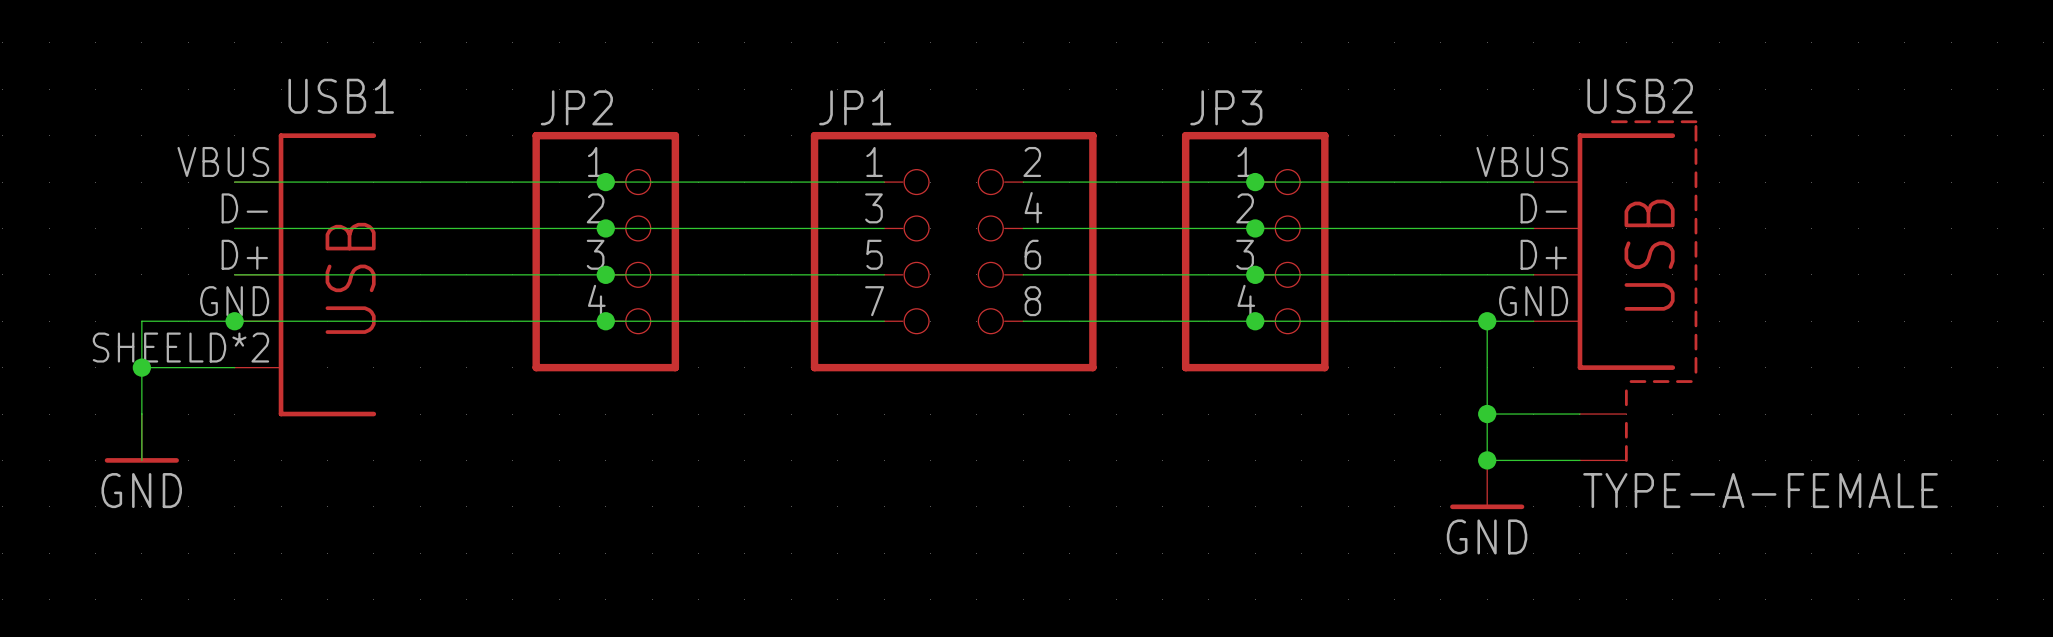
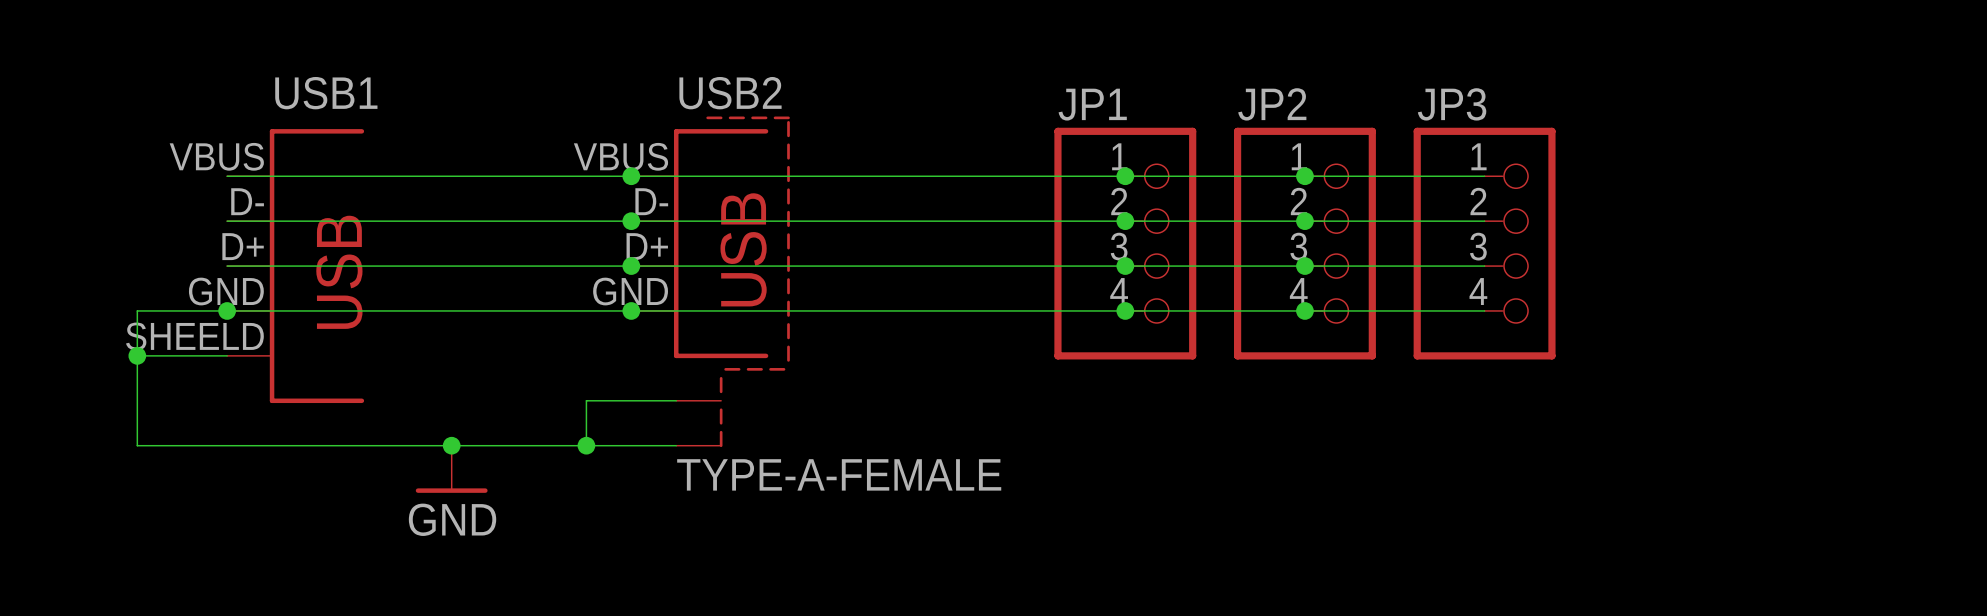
JP1 name position: JP1 (855, 107) -> JP1 (1092, 104)
JP1 symbol: [810, 131, 1097, 372] -> [1054, 127, 1197, 360]
junction: (605, 182) -> none
junction: none -> (631, 176)
wire: none -> (855, 176) (990, 176)
junction: none -> (1125, 176)
junction: (1255, 182) -> none
junction: none -> (1304, 176)
junction: (605, 228) -> none
junction: none -> (631, 221)
wire: none -> (855, 221) (990, 221)
junction: none -> (1125, 221)
junction: (1255, 228) -> none
junction: none -> (1304, 221)
JP2 position: (605, 251) -> (1304, 243)
JP3 position: (1255, 251) -> (1484, 243)
junction: (605, 274) -> none
junction: none -> (631, 266)
wire: none -> (855, 266) (990, 266)
junction: none -> (1125, 266)
junction: (1255, 274) -> none
junction: none -> (1304, 266)
USB2 position: (1615, 291) -> (710, 281)
junction: (605, 321) -> none
junction: none -> (631, 310)
wire: none -> (855, 310) (990, 310)
junction: none -> (1125, 310)
junction: (1255, 321) -> none
junction: none -> (1304, 310)
wire: (1487, 321) (1487, 460) (1579, 460) -> none
junction: (1487, 321) -> none
USB1 pin number: SHEELD*2 (180, 347) -> SHEELD (194, 336)
wire: none -> (676, 400) (586, 400) (586, 445)
wire: (1487, 414) (1579, 414) -> none
junction: (1487, 414) -> none
power symbol position: GND (141, 438) -> GND (451, 469)
wire: none -> (137, 445) (676, 445)
junction: none -> (451, 445)
junction: none -> (586, 445)
junction: (1487, 460) -> none
power symbol: GND (1487, 484) -> none

